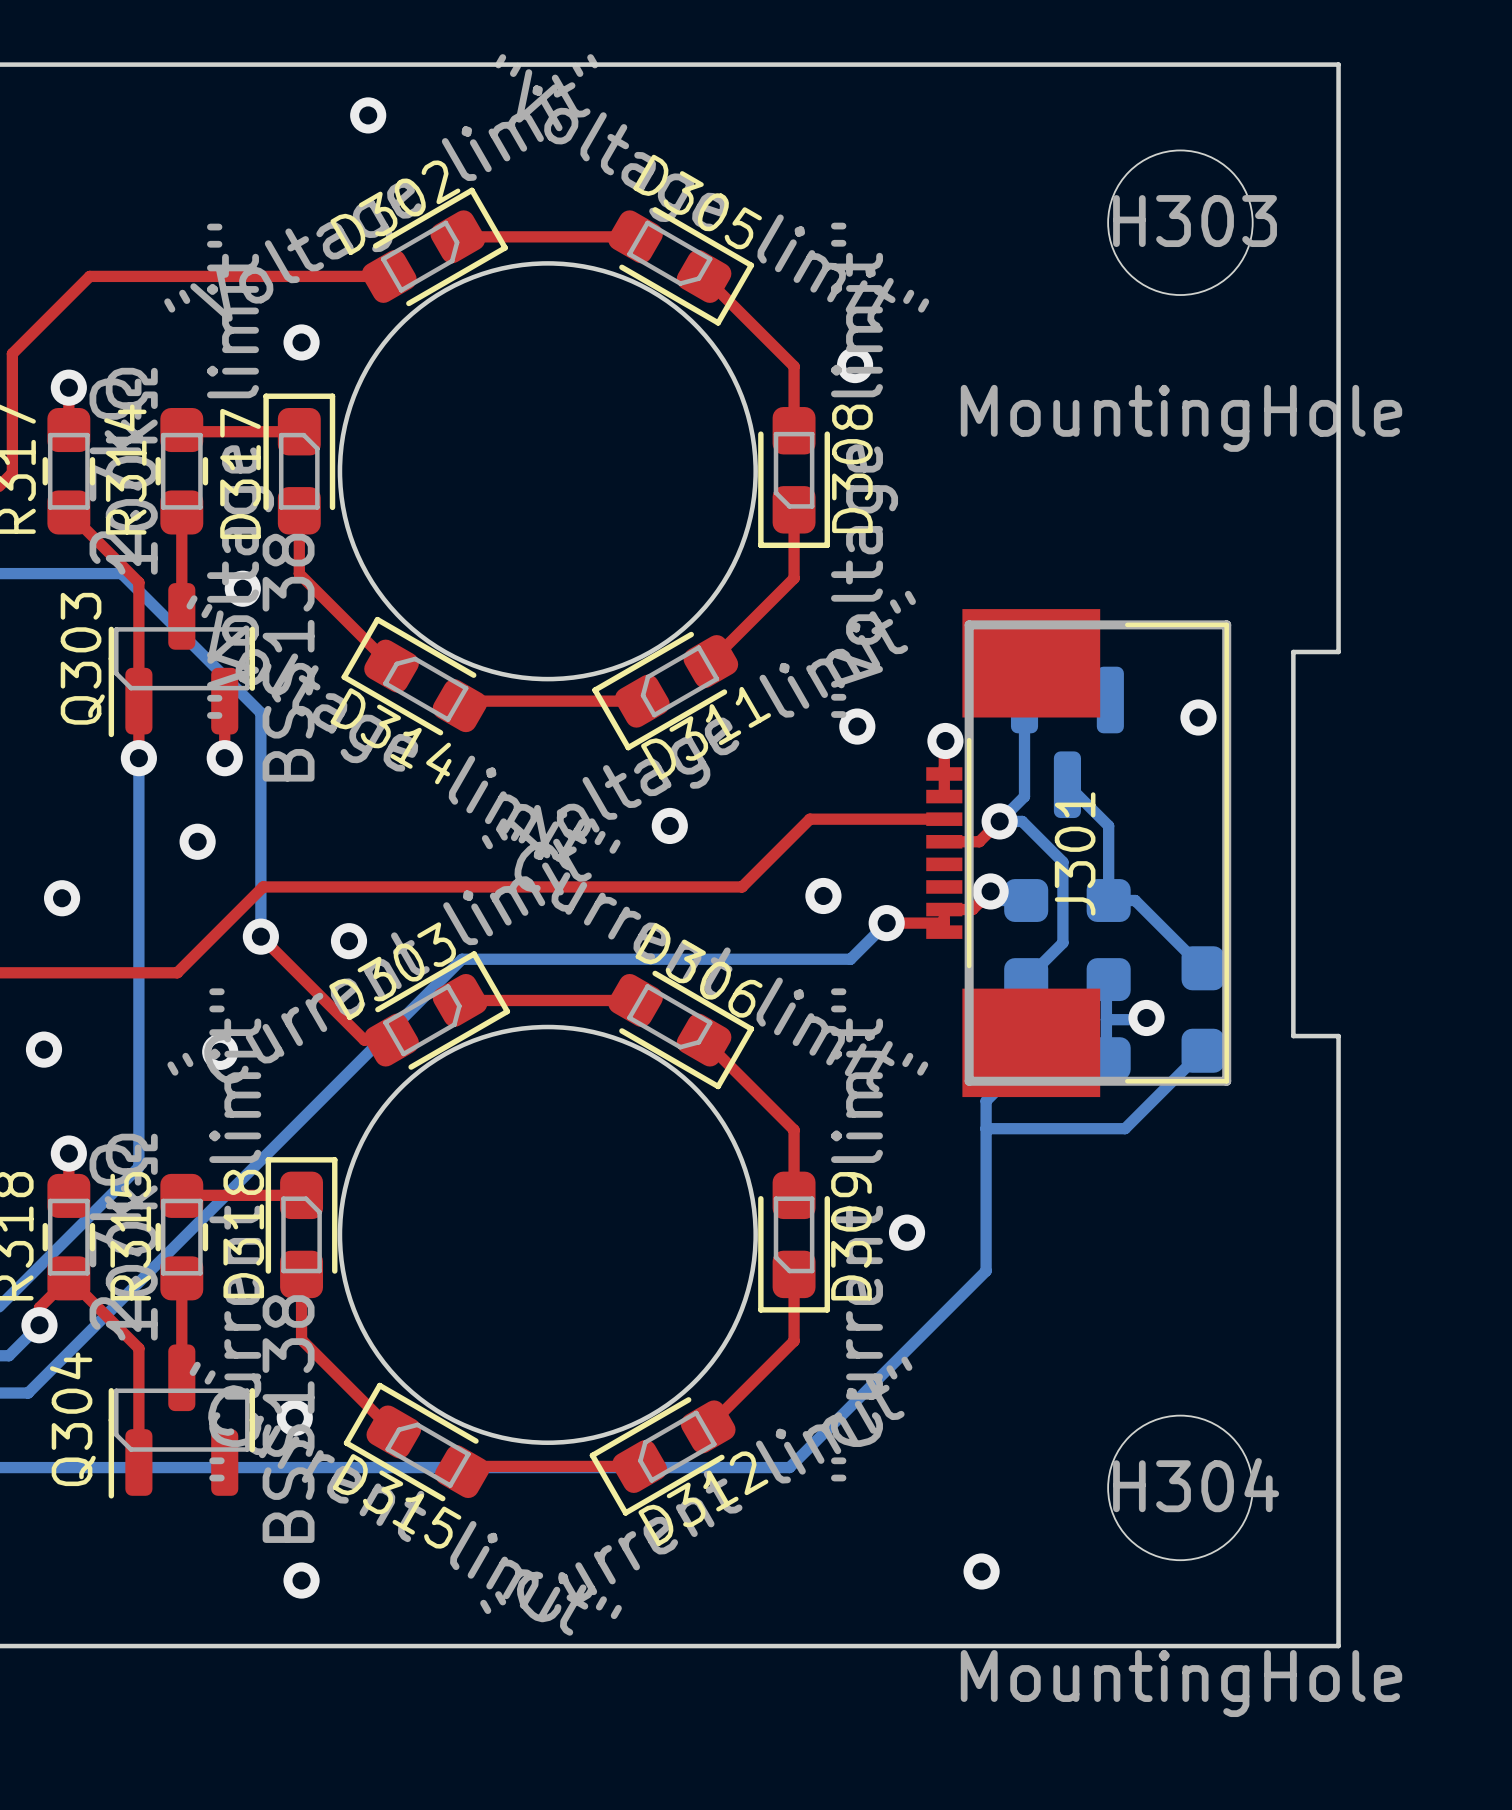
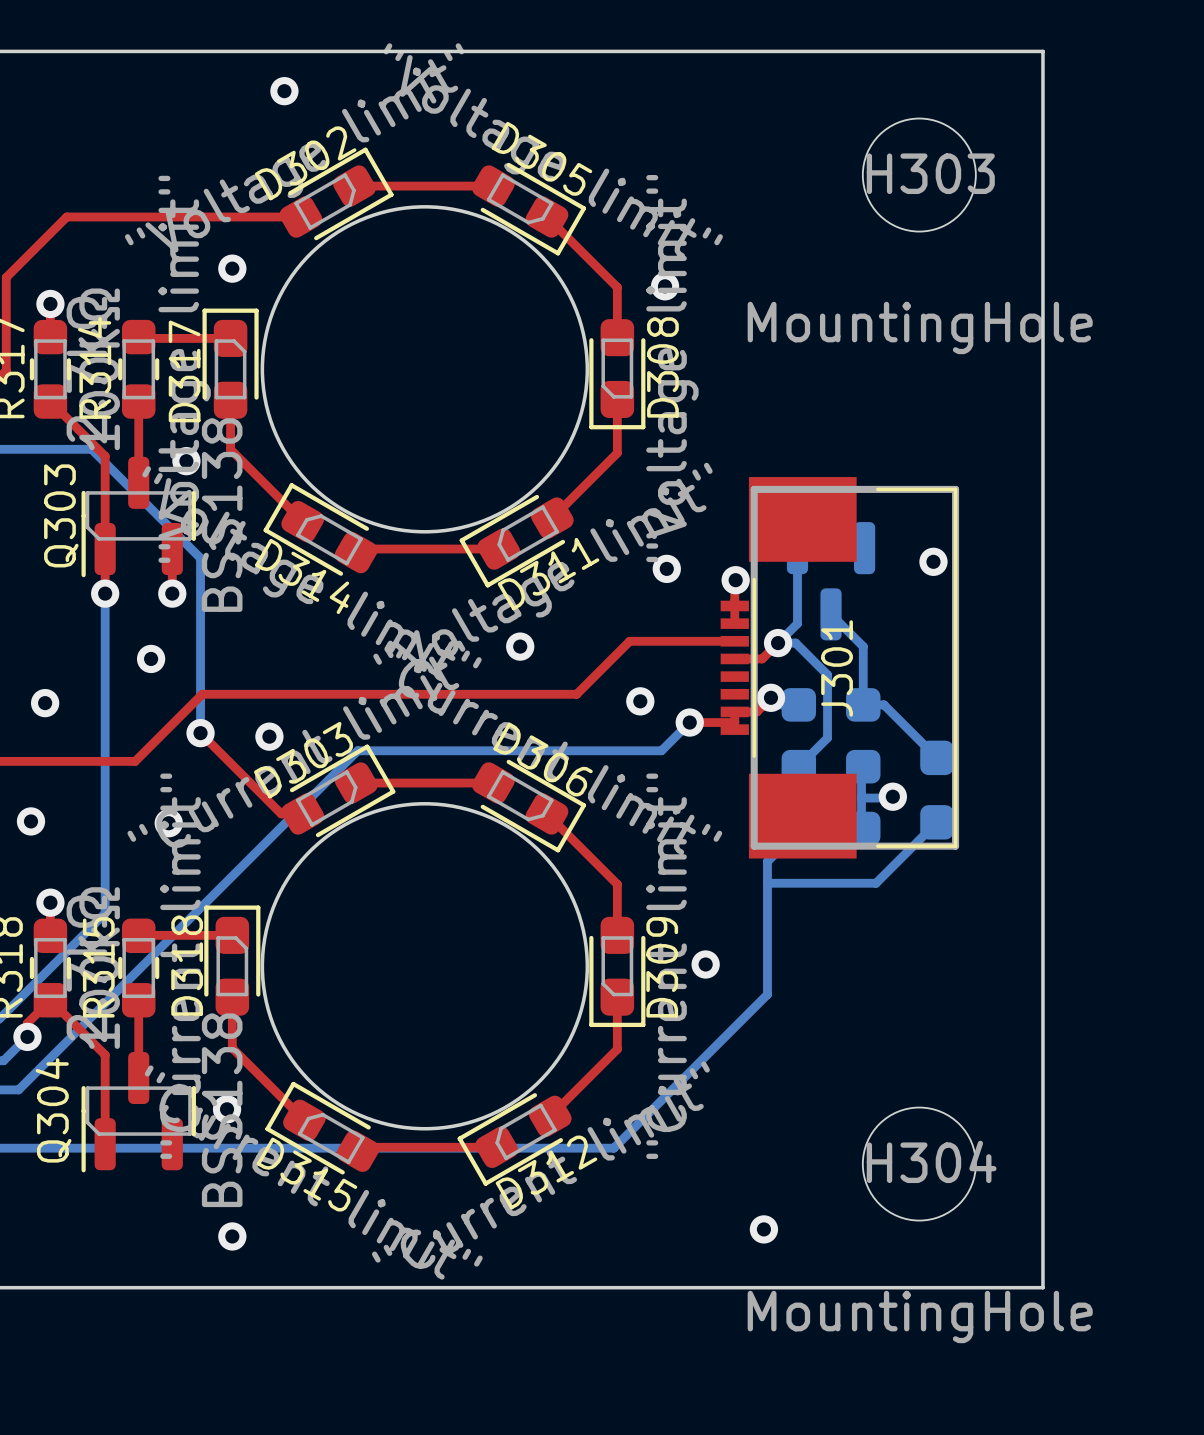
board edge: (1338, 651) (1293, 651) (1293, 1036) (1338, 1036) -> (1042, 510) (1042, 810)

